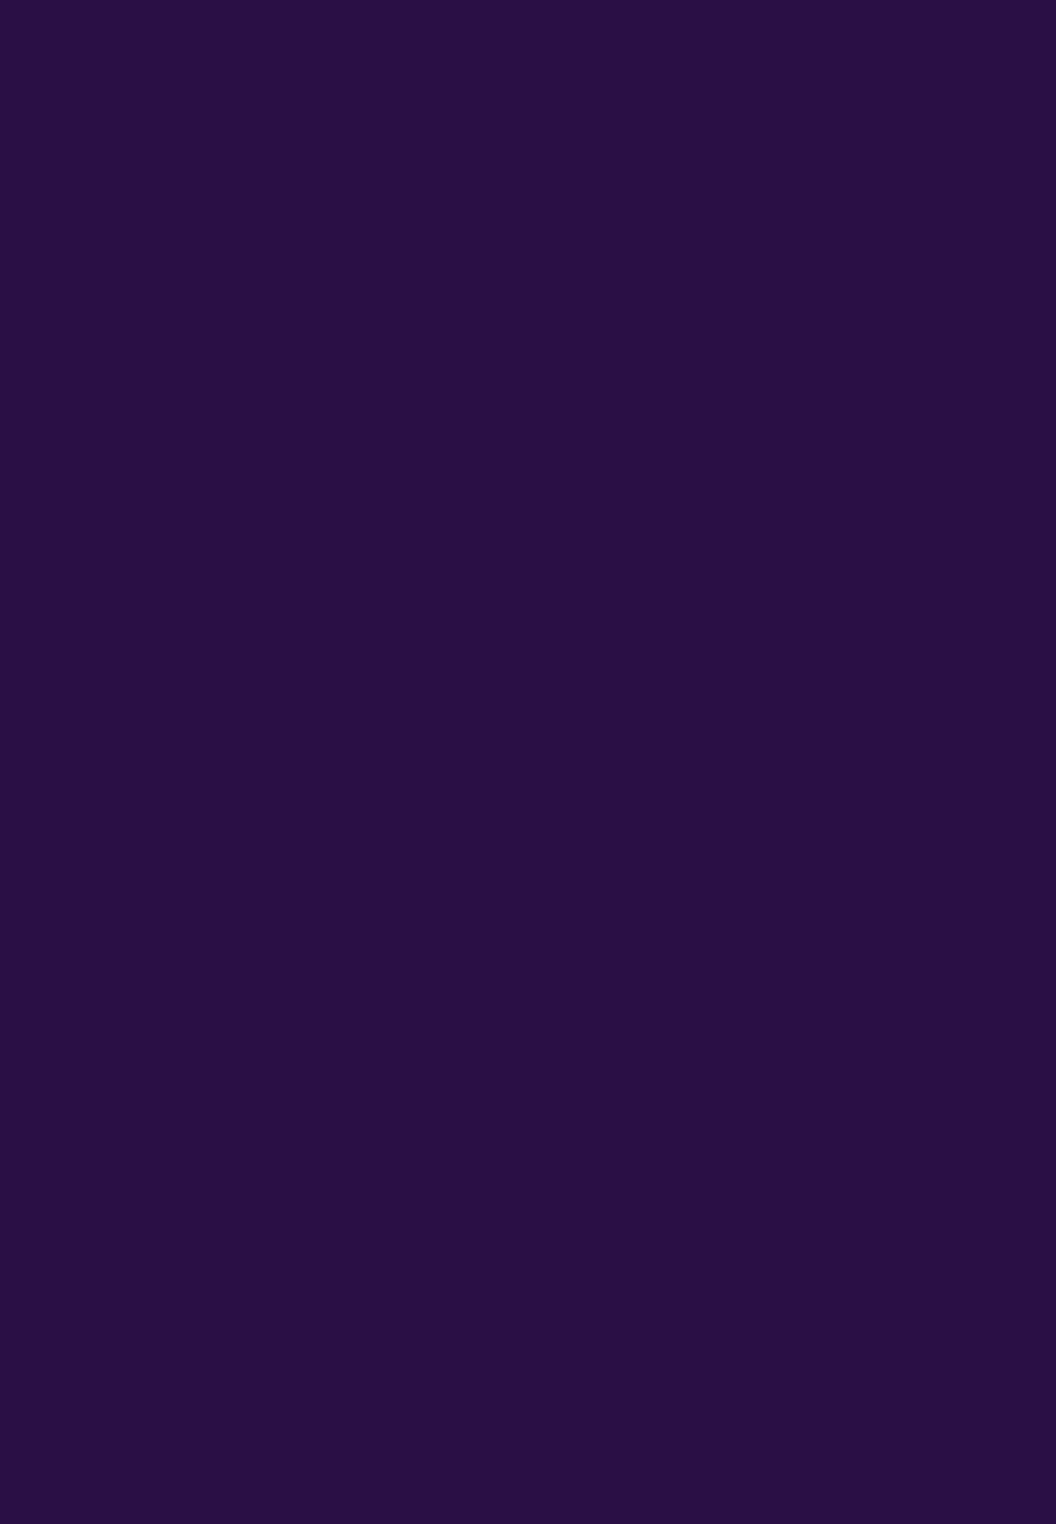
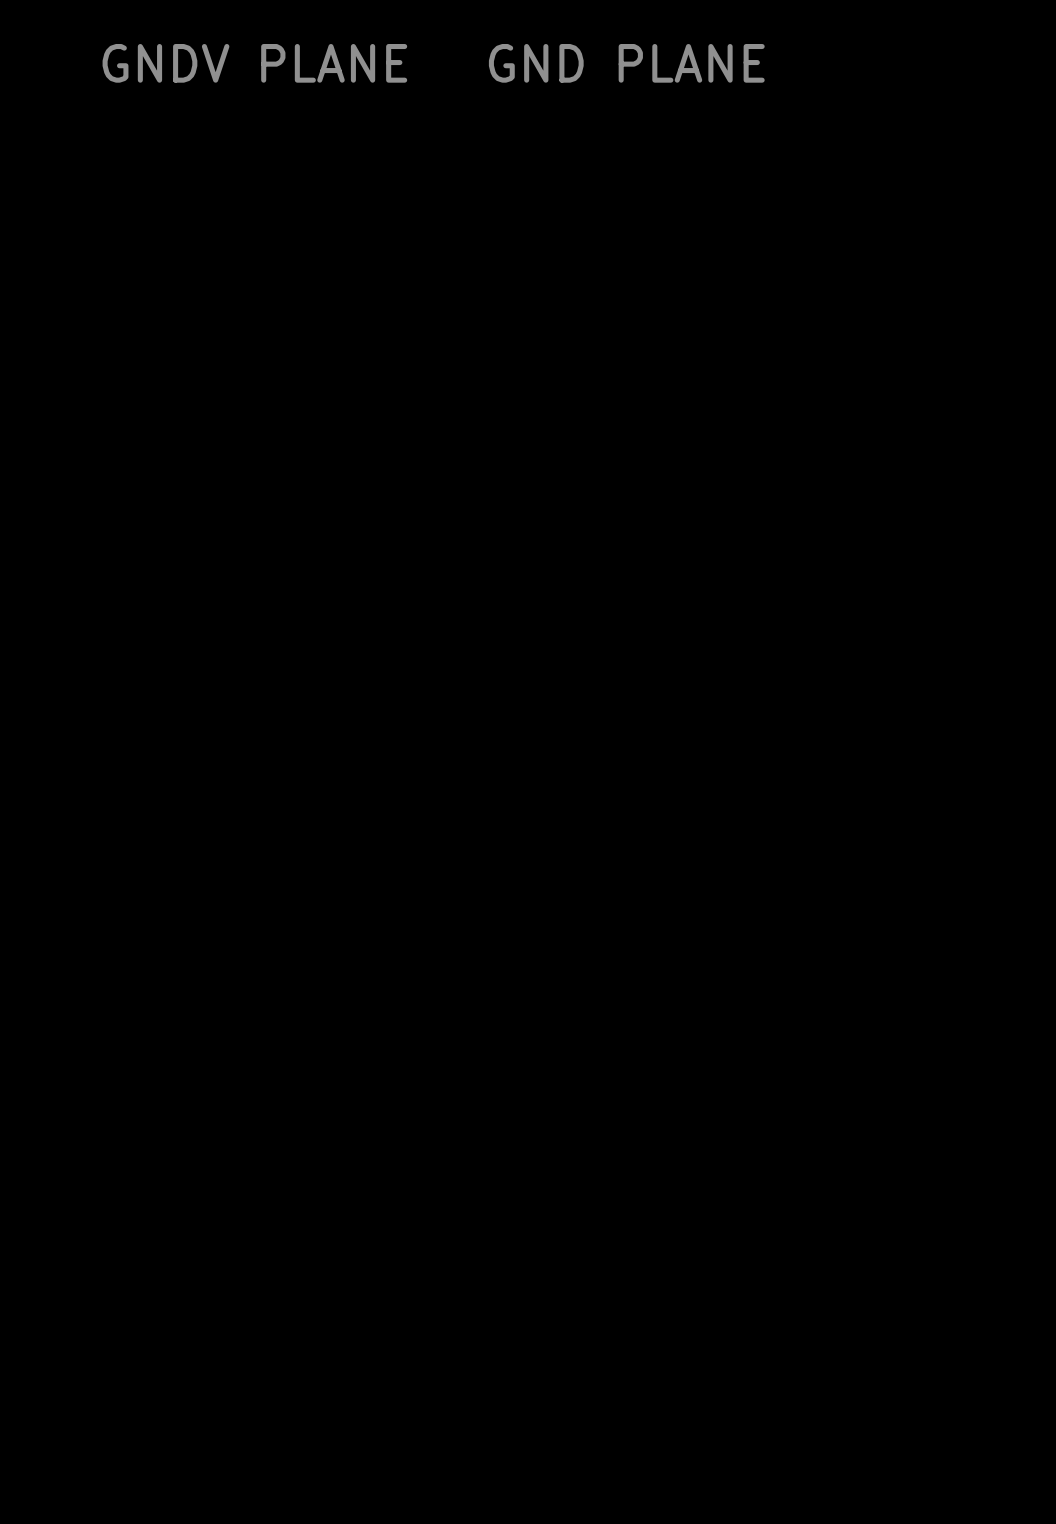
text: none -> GNDV PLANE (254, 63)
text: none -> GND PLANE (626, 63)

